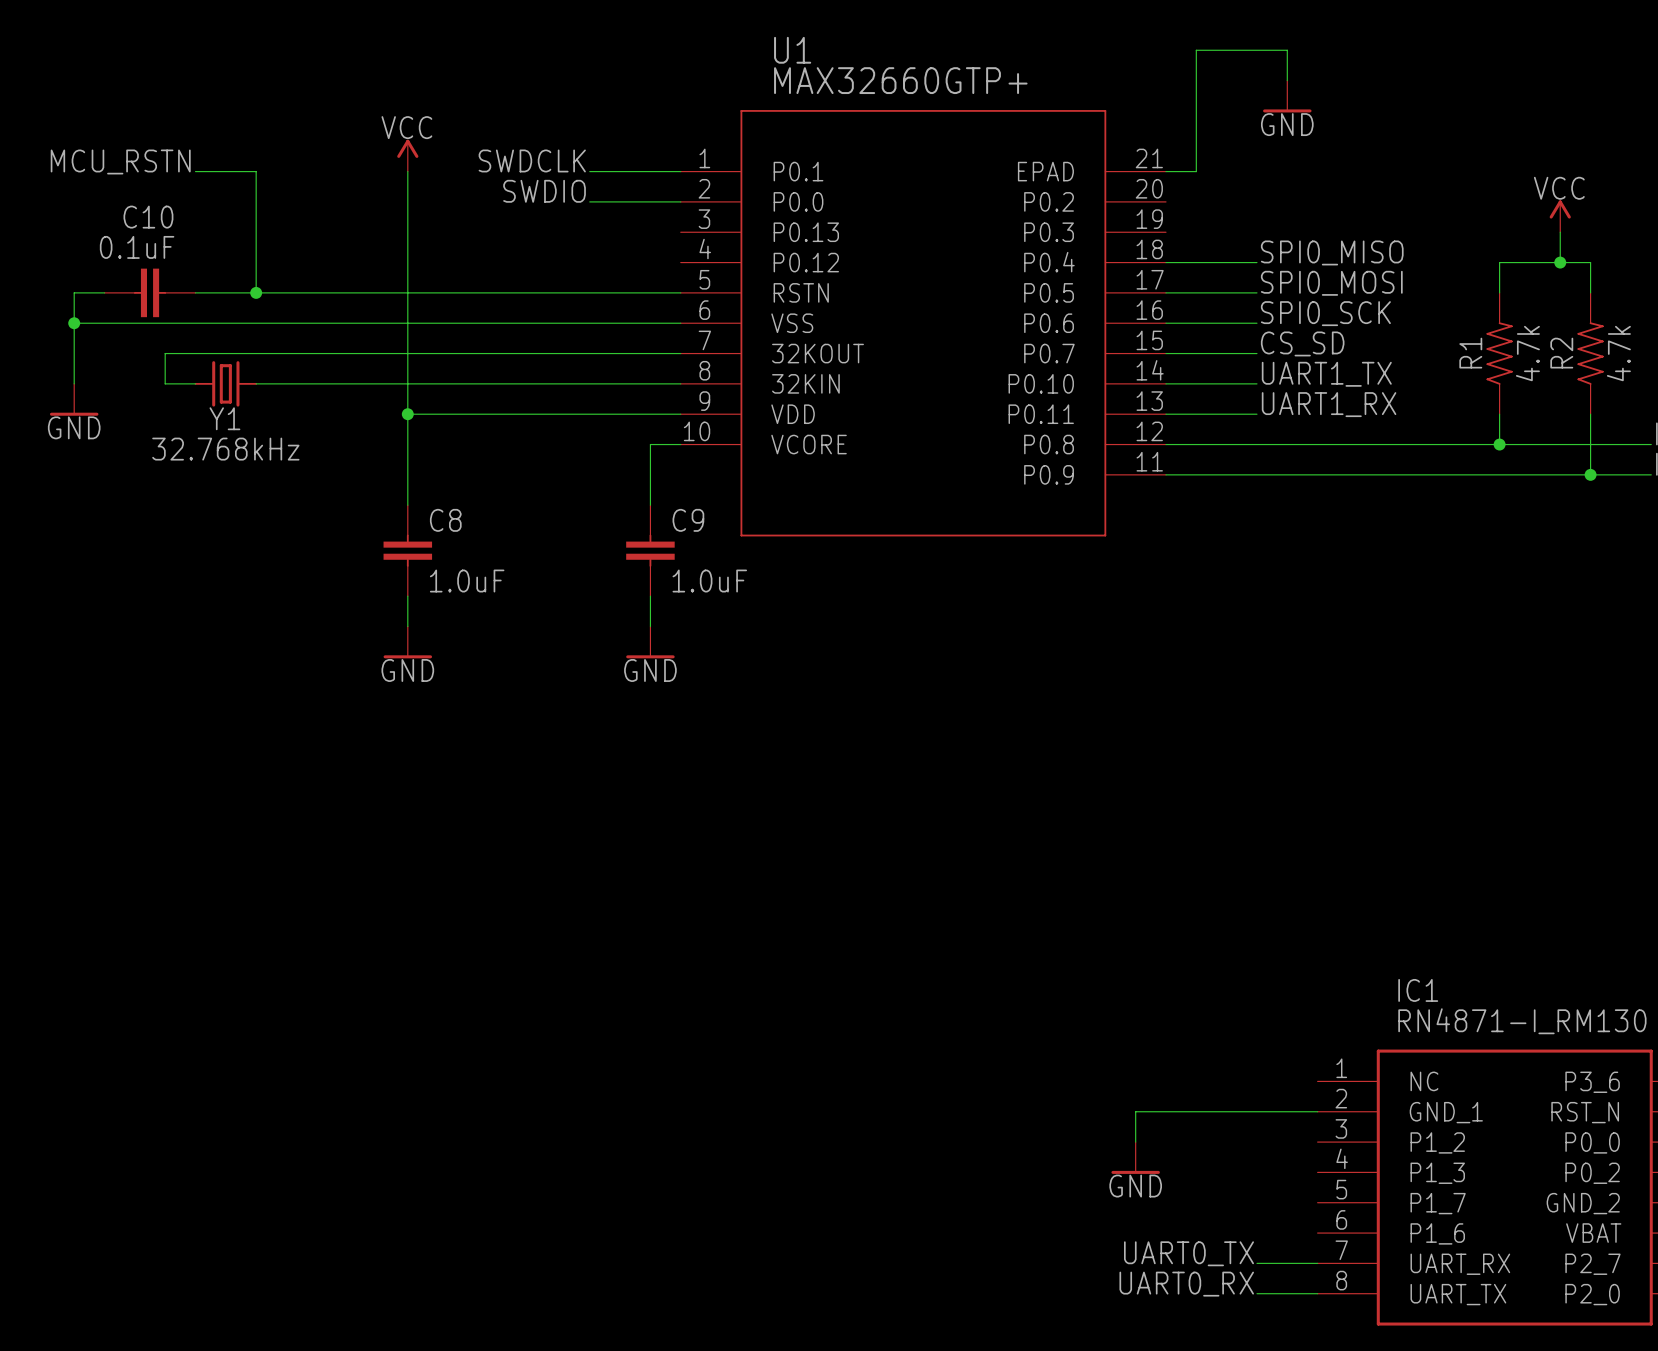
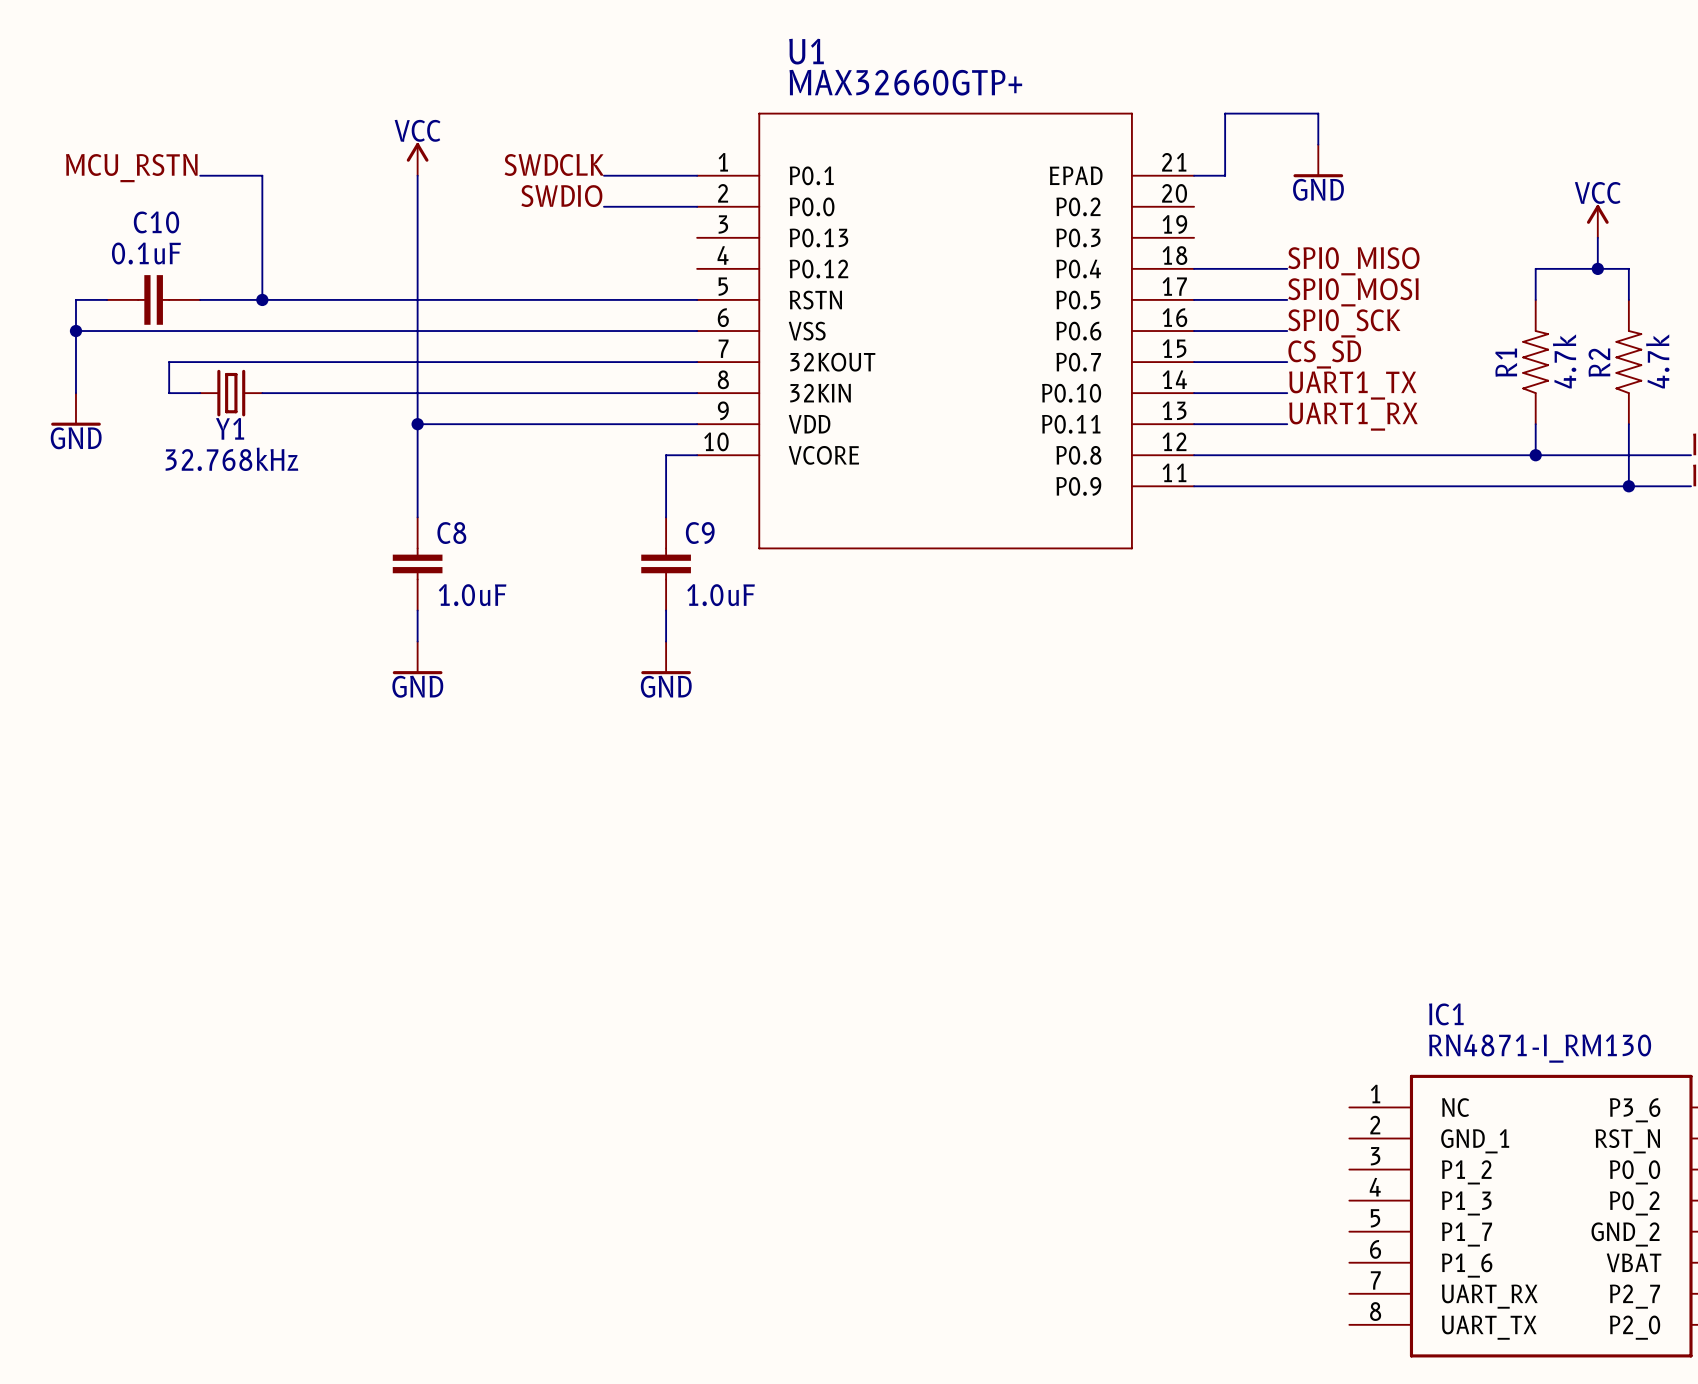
wire: (1287, 80) (1287, 50) (1196, 50) (1196, 110) -> (1318, 144) (1318, 113) (1225, 113)
power symbol position: GND (1287, 96) -> GND (1318, 160)
wire: (1317, 1111) (1135, 1111) (1135, 1142) -> none
power symbol: GND (1135, 1157) -> none
label: UART0_TX (1188, 1253) -> none
wire: (1256, 1263) (1317, 1263) -> none
label: UART0_RX (1186, 1284) -> none
wire: (1256, 1293) (1317, 1293) -> none

